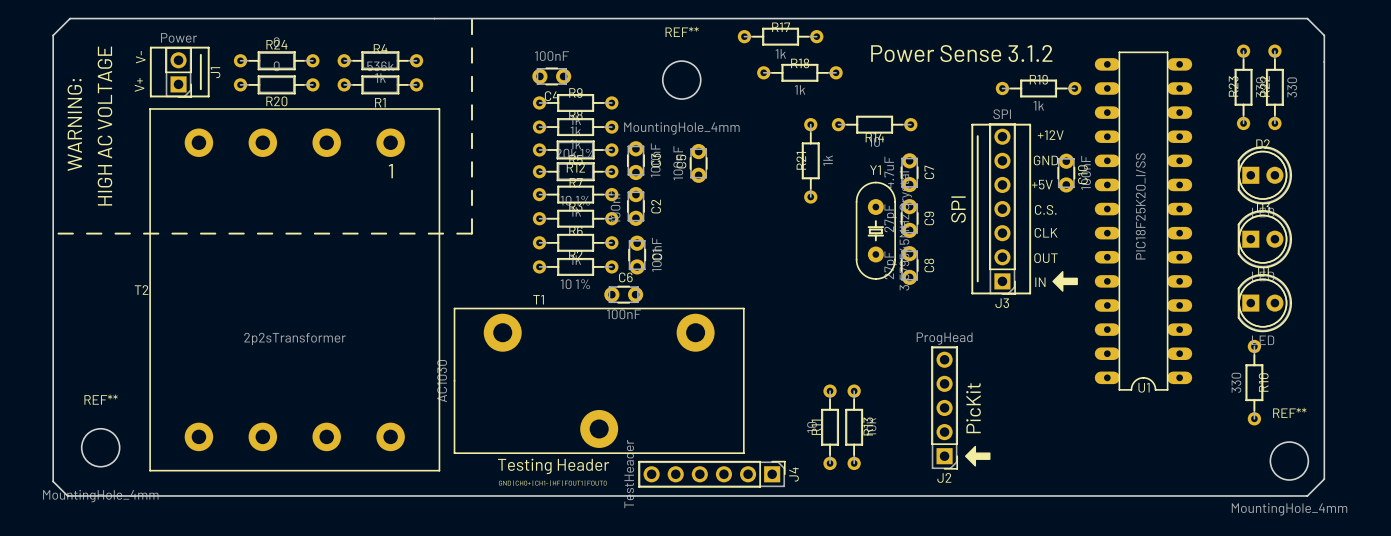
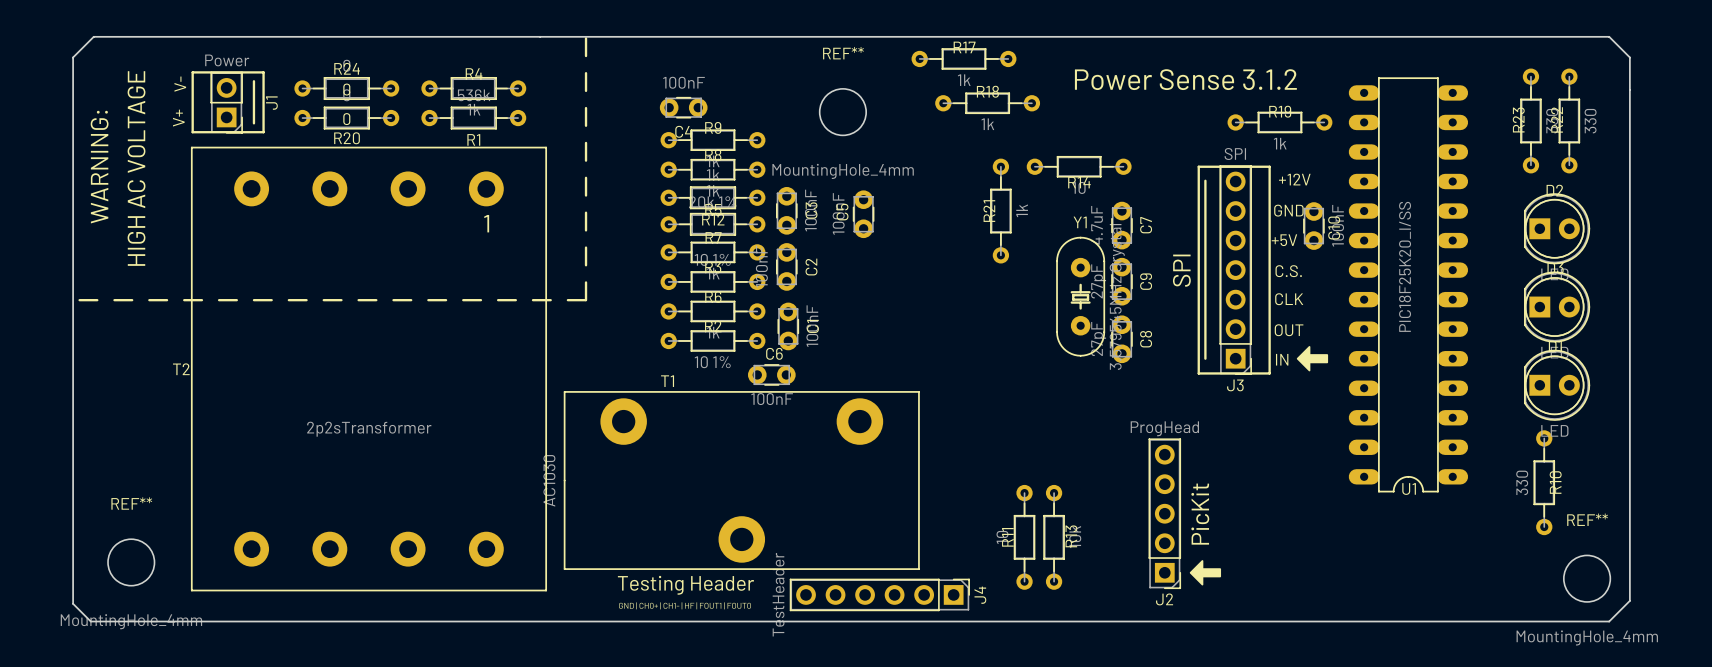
text: none -> 0 (346, 89)
text: none -> 0 (346, 119)

